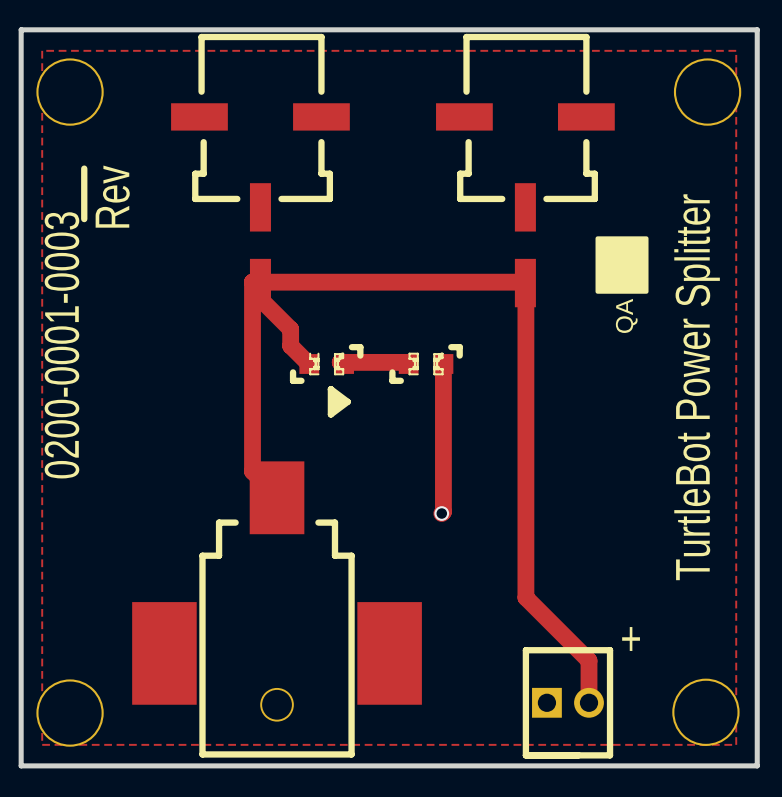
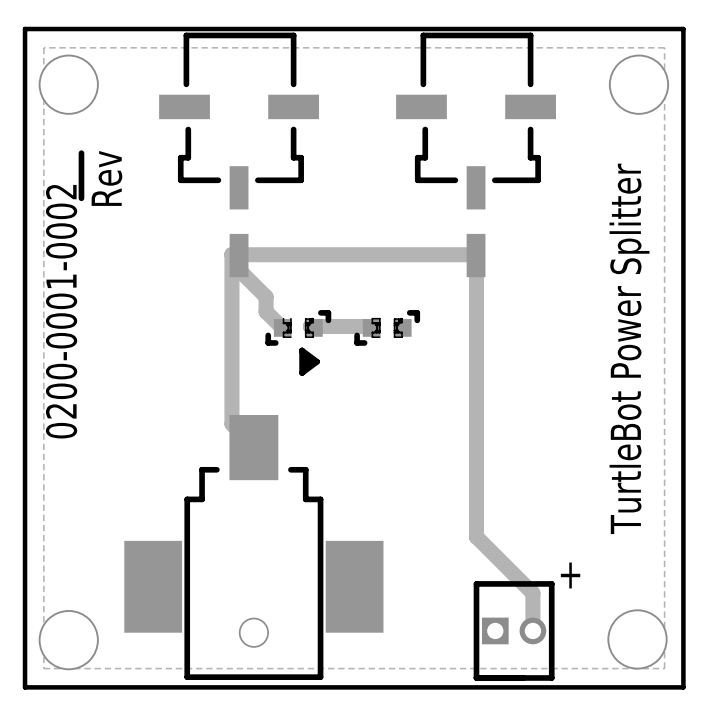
drawing: [595, 236, 649, 294] -> none
text: QA (626, 315) -> none
text: 0200-0001-0003 (61, 345) -> 0200-0001-0002 (61, 311)
track: (443, 363) (443, 511) (441, 513) -> none
via: (441, 513) -> none

